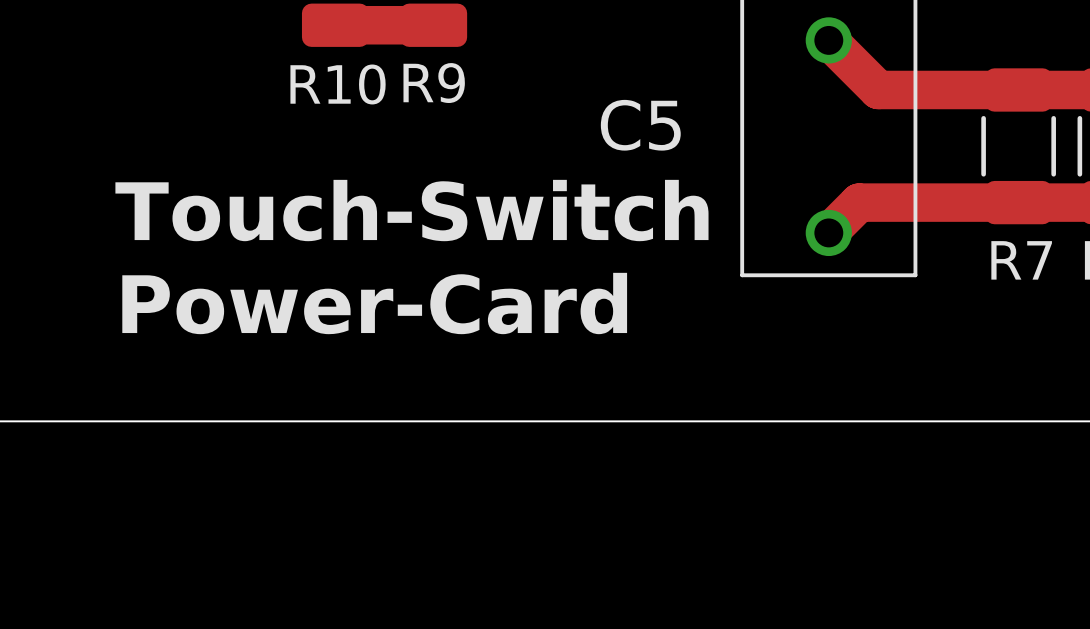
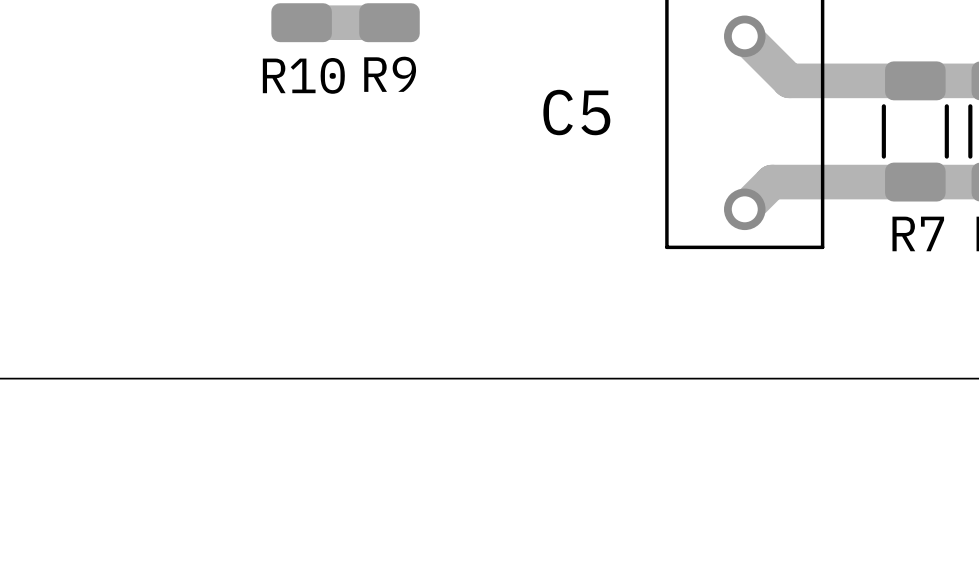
text: Touch-Switch (411, 210) -> none
text: Power-Card (374, 303) -> none

